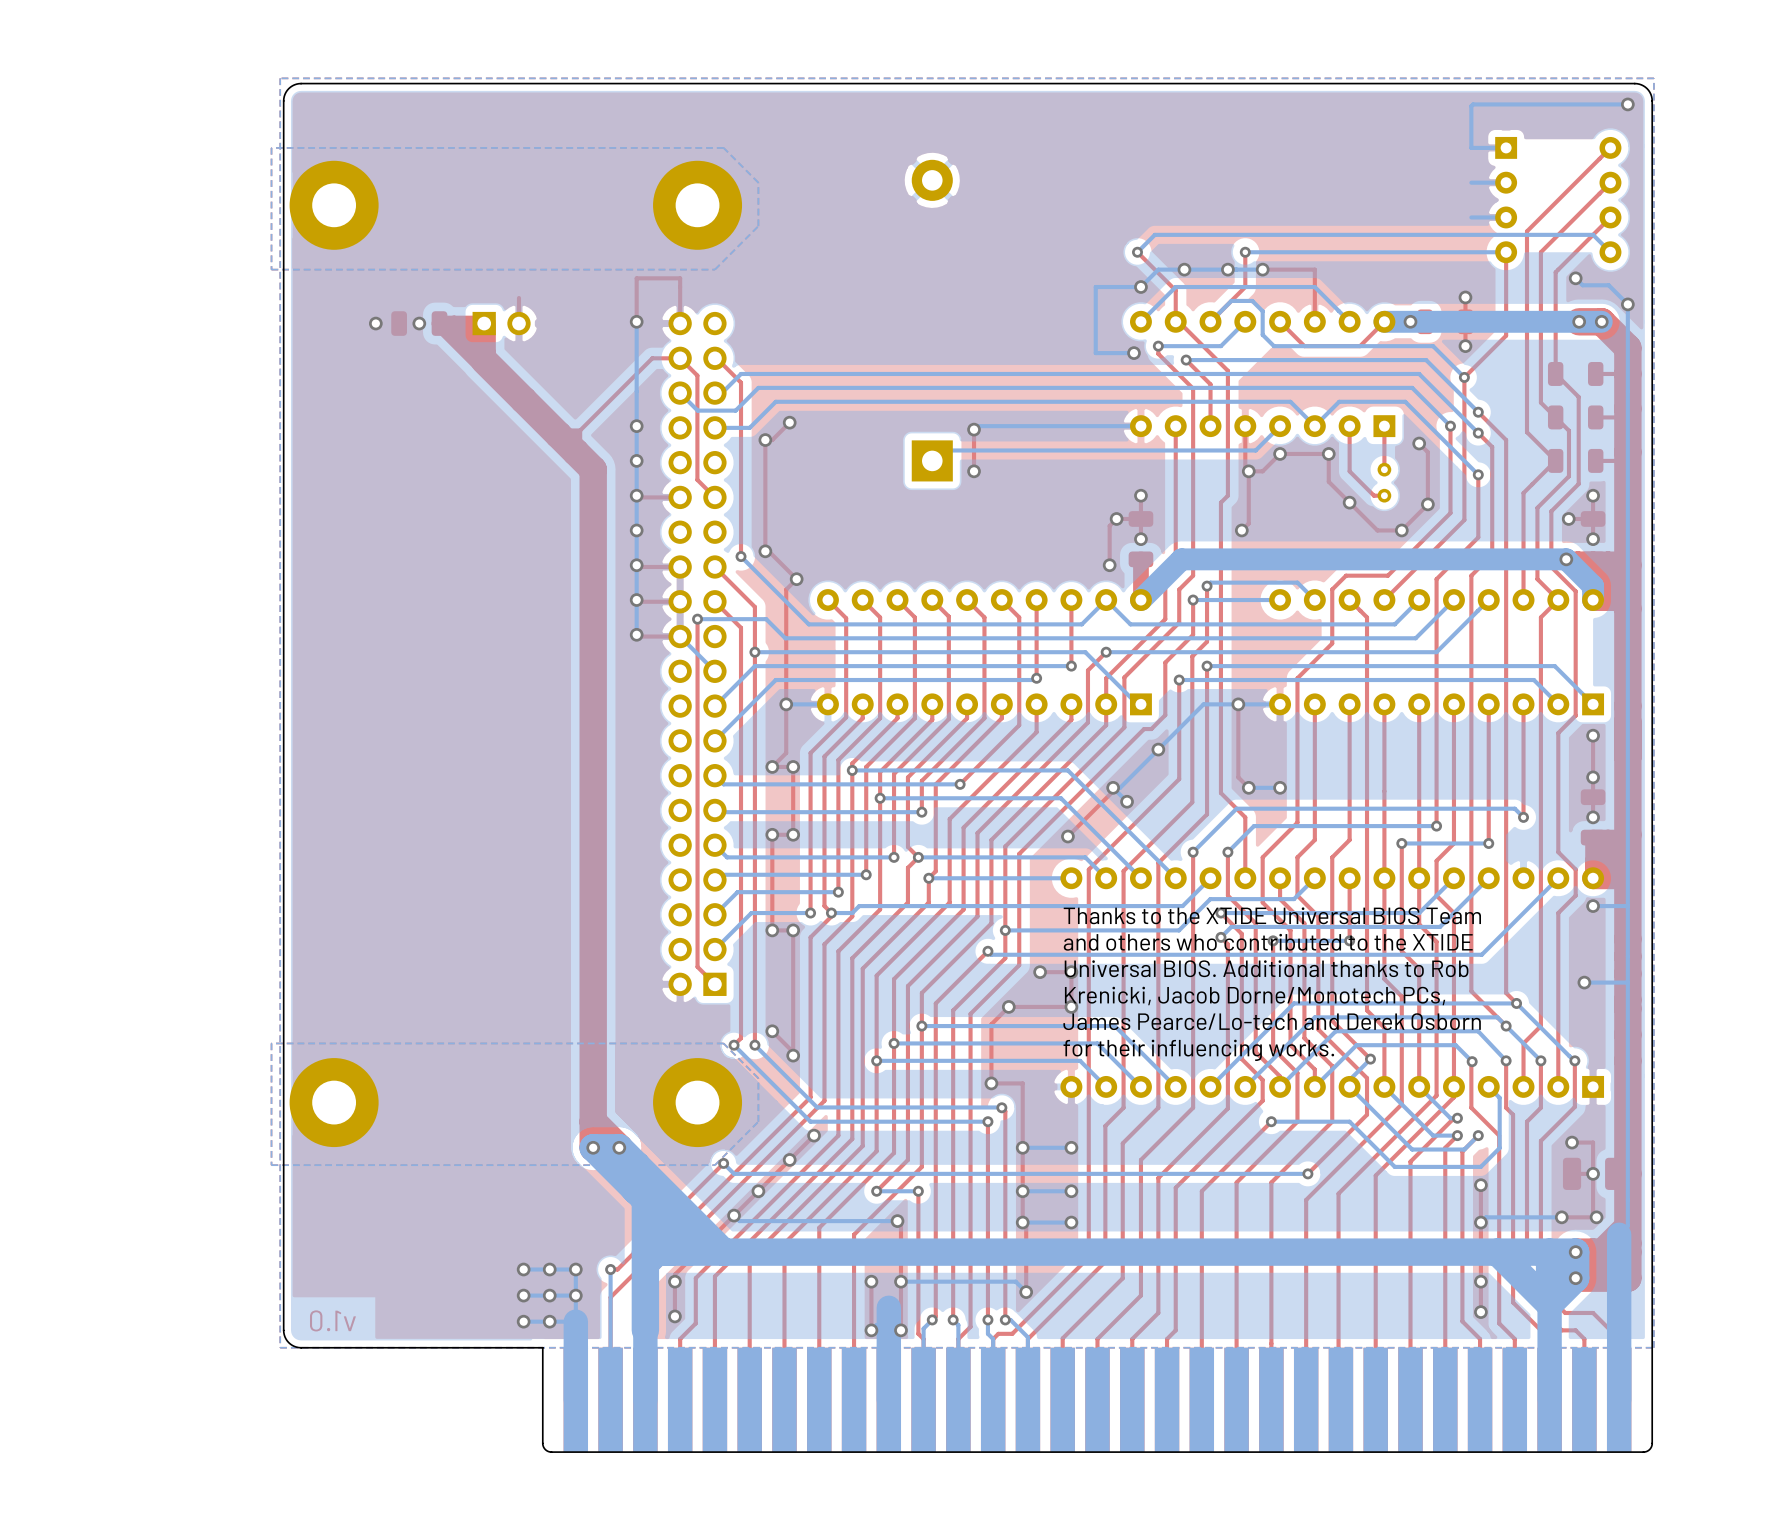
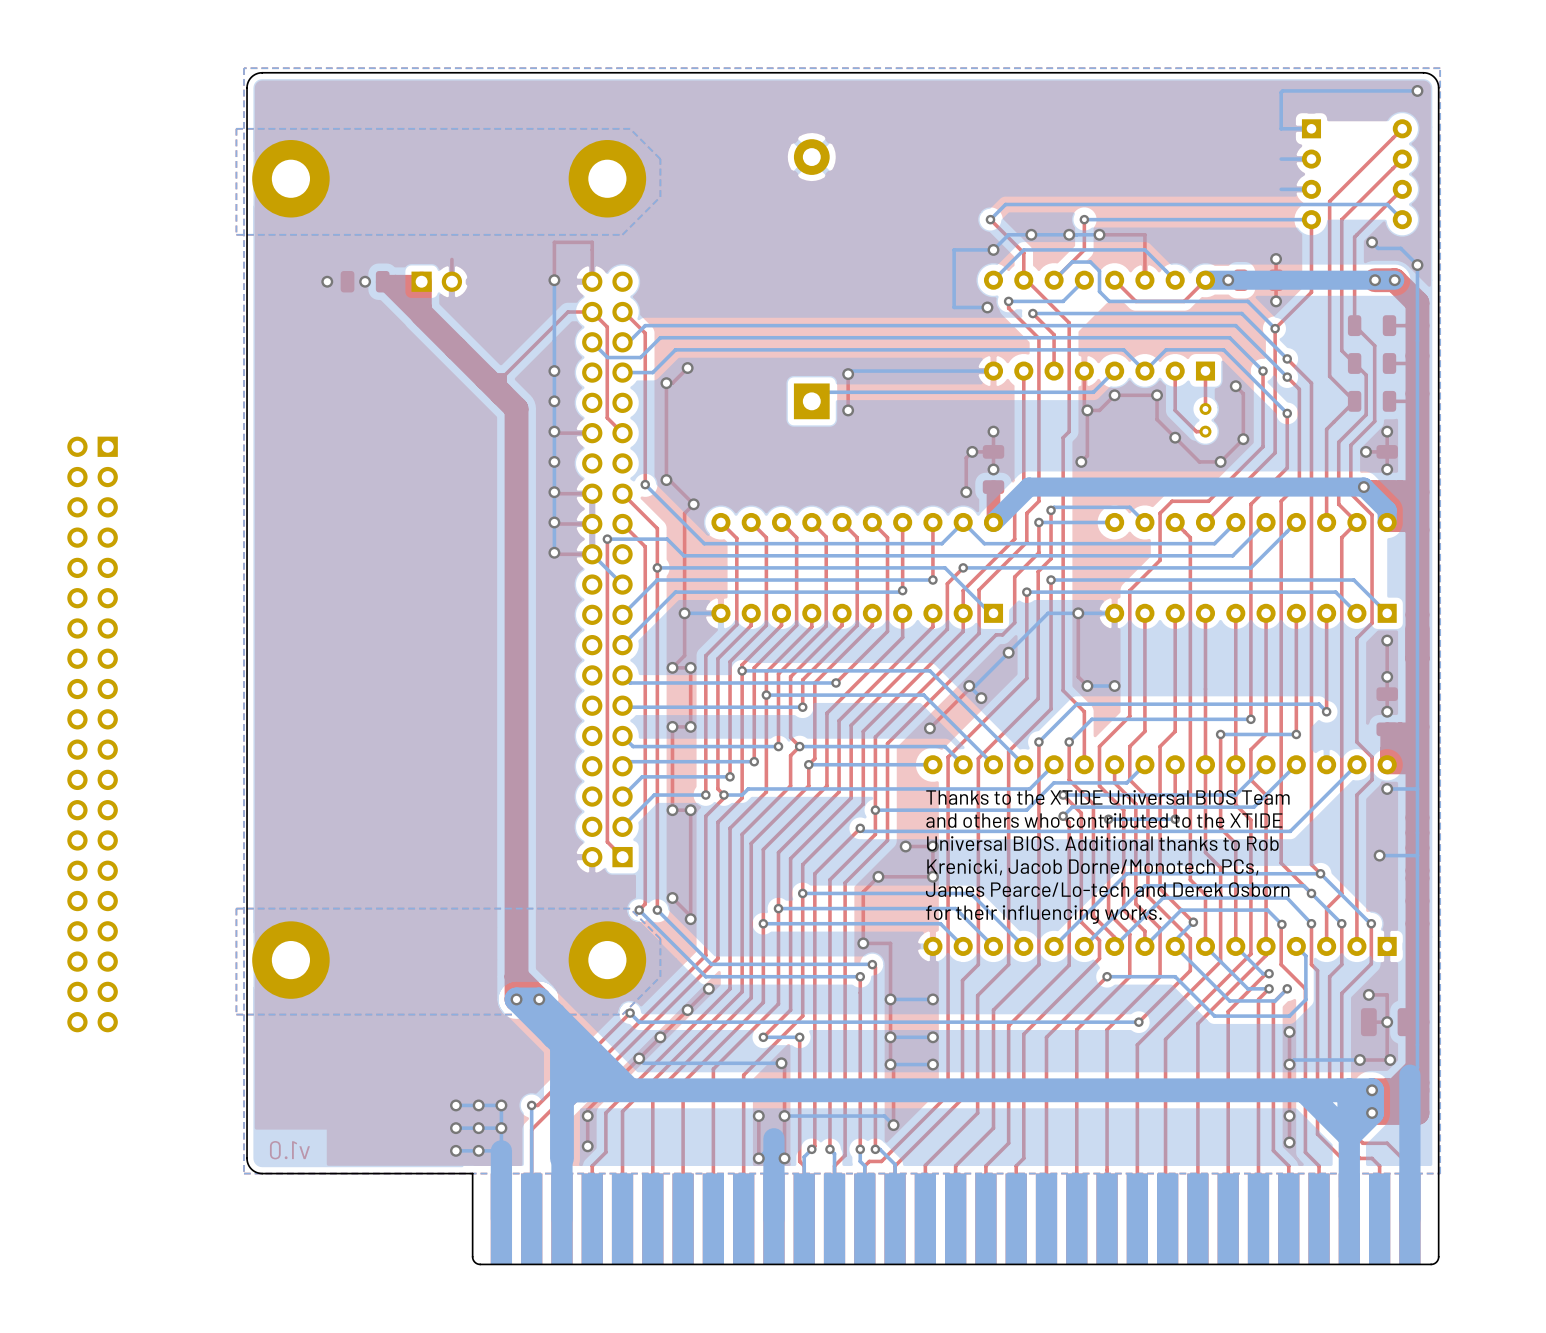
part: none -> (92, 734)

